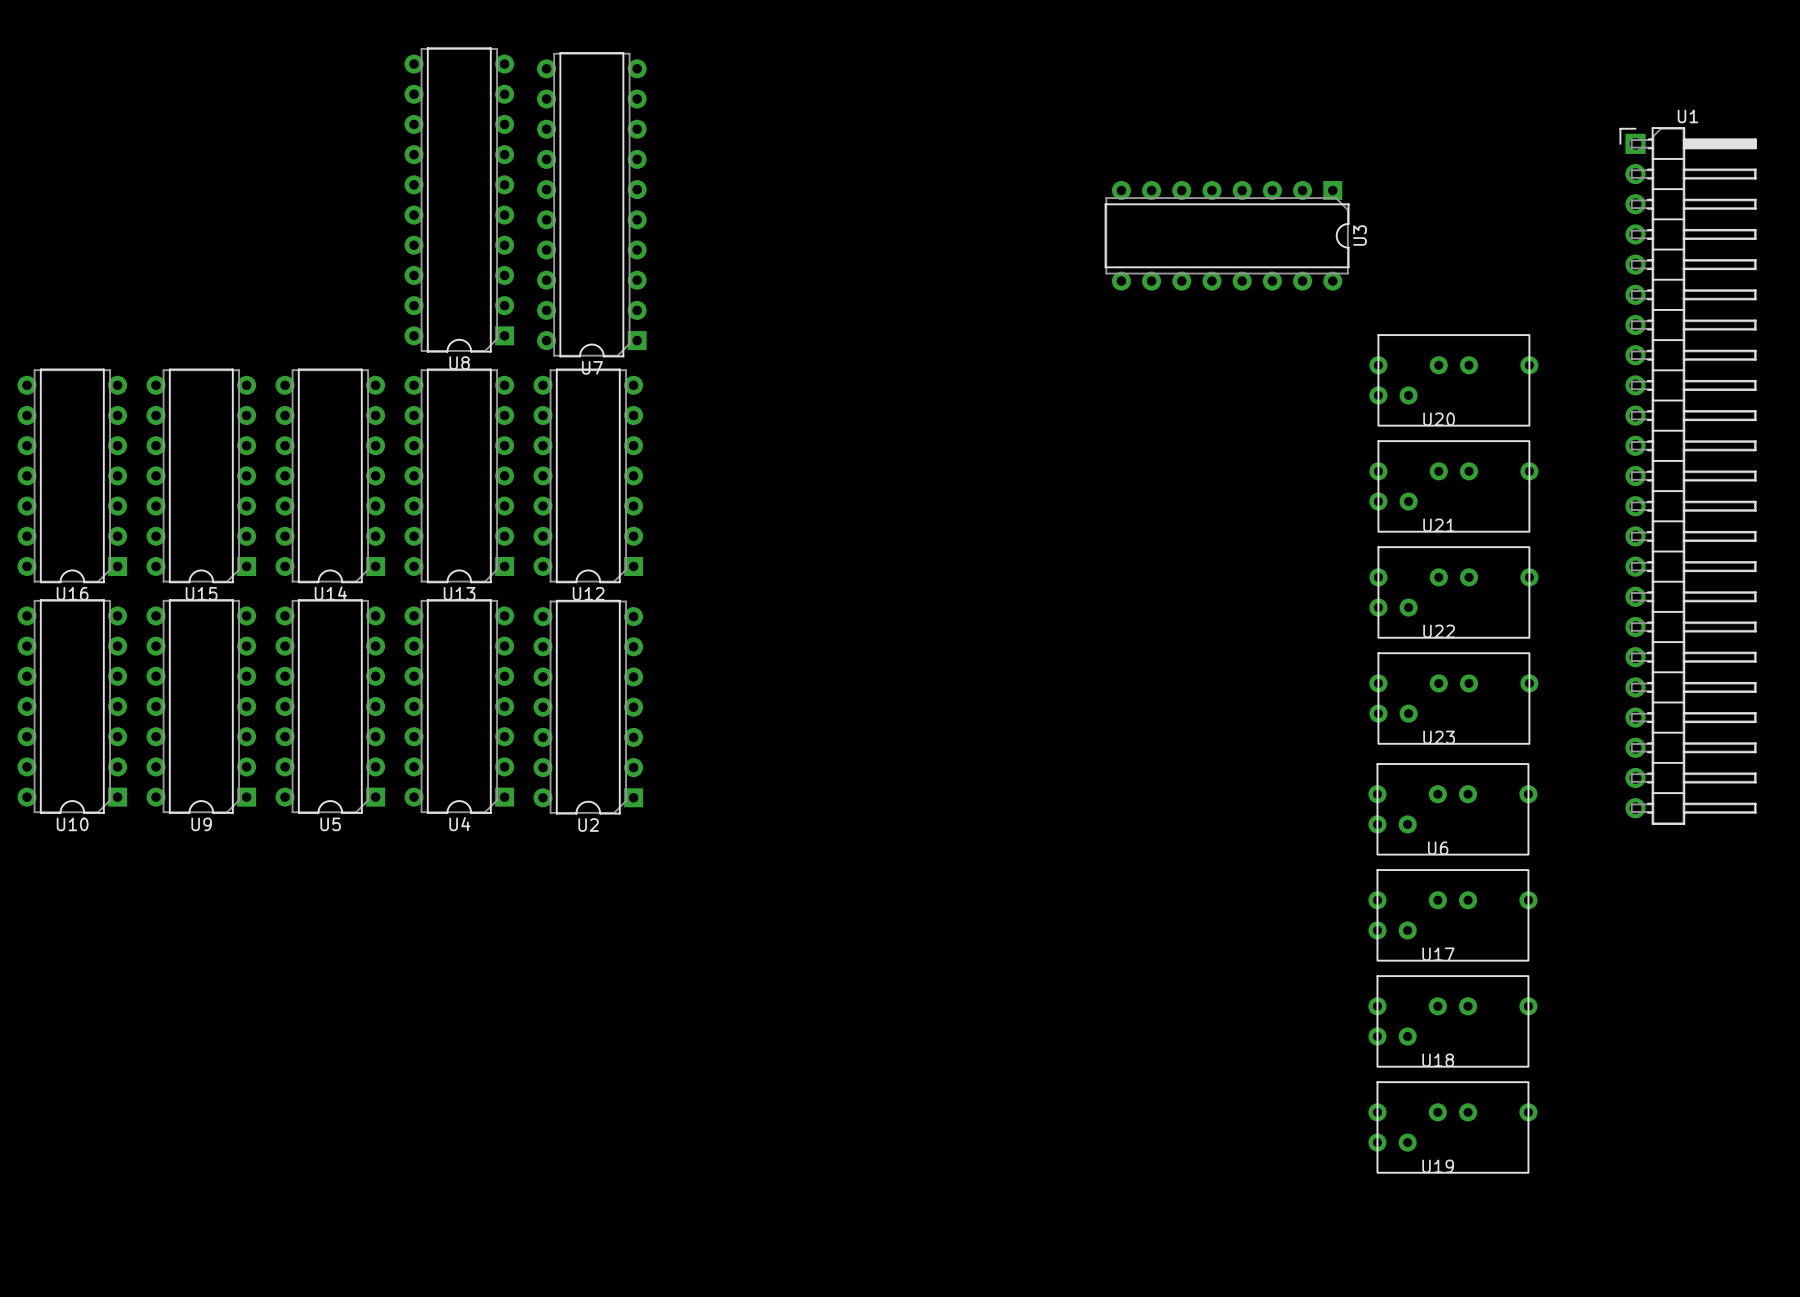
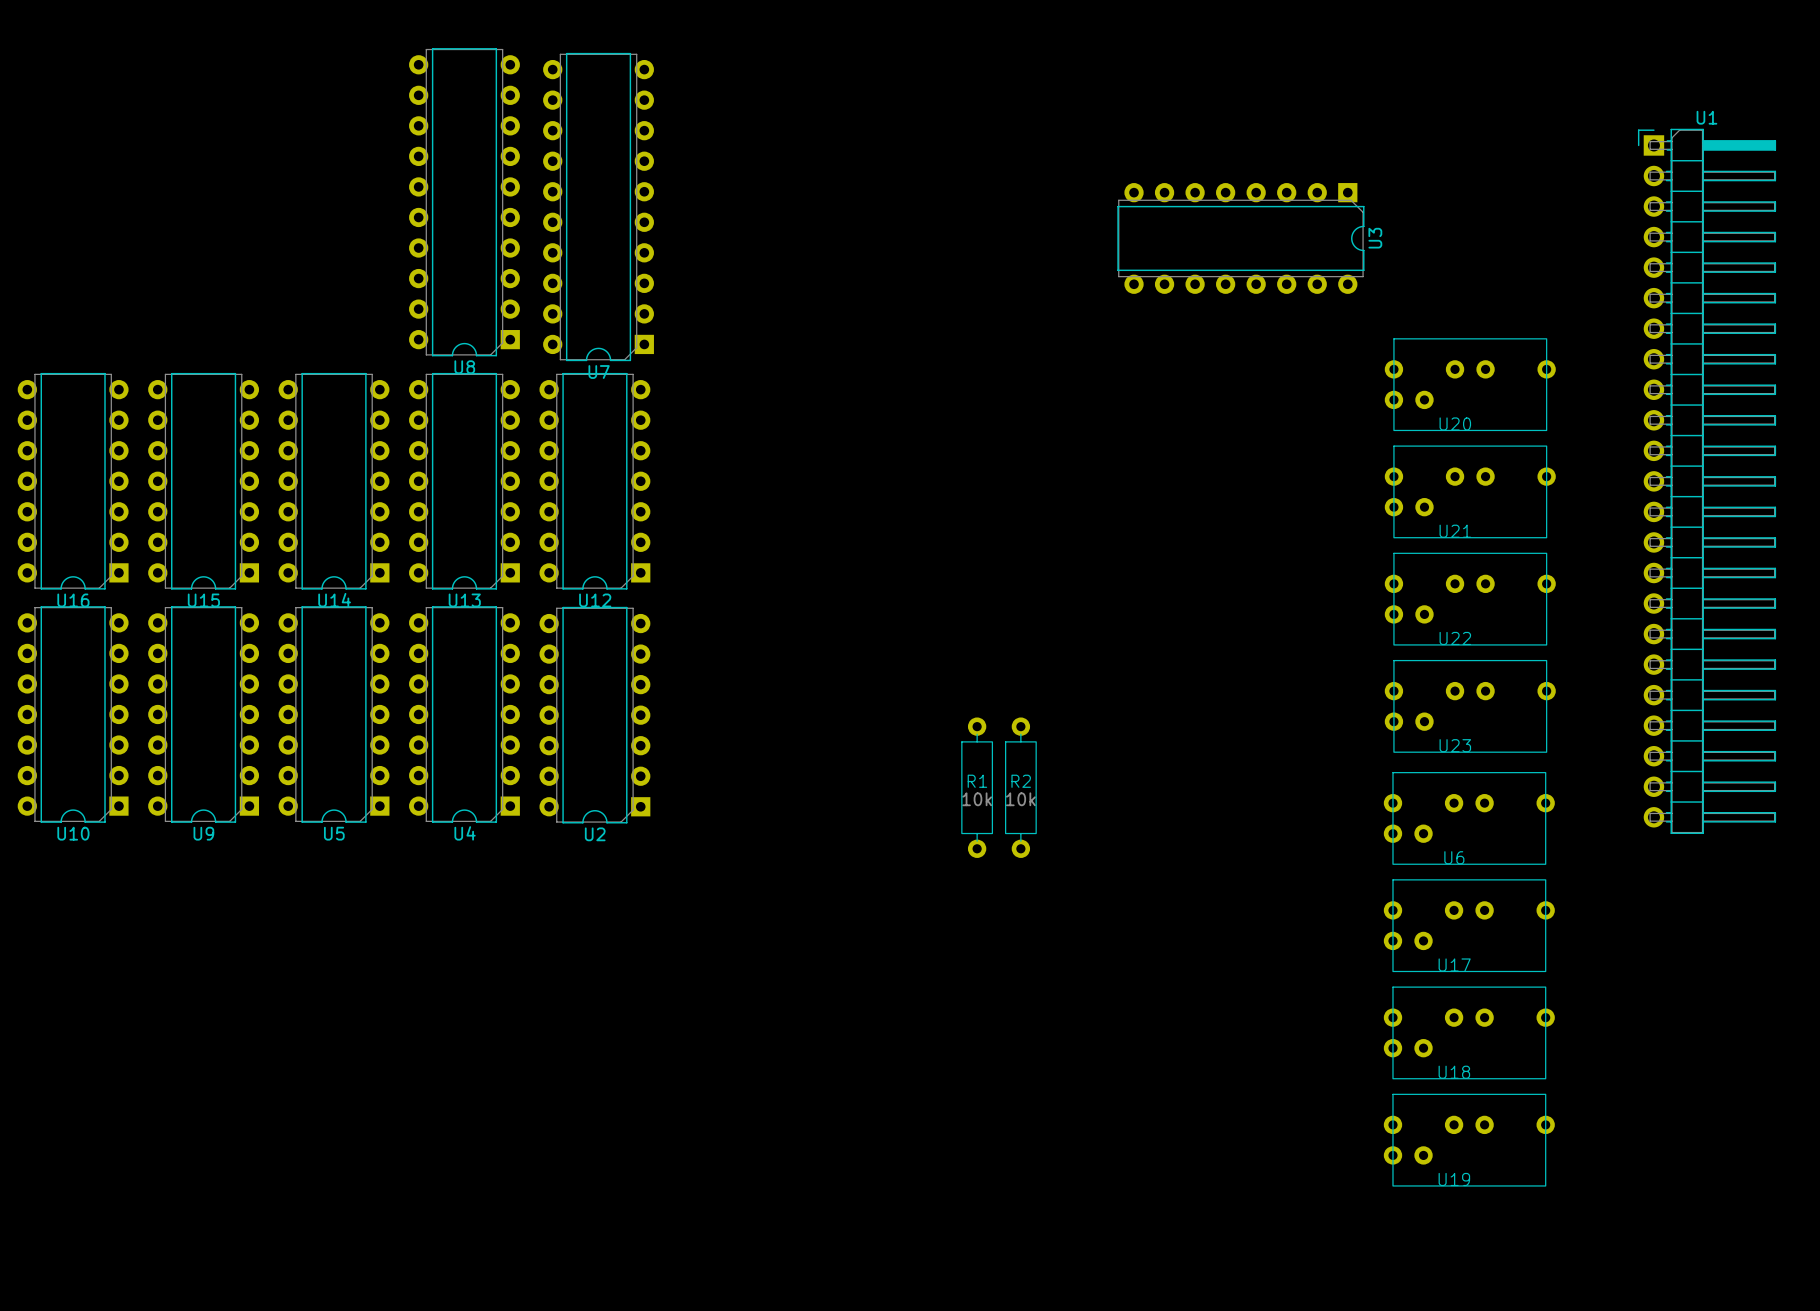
R1: none -> 10k (977, 787)
R2: none -> 10k (1020, 787)

